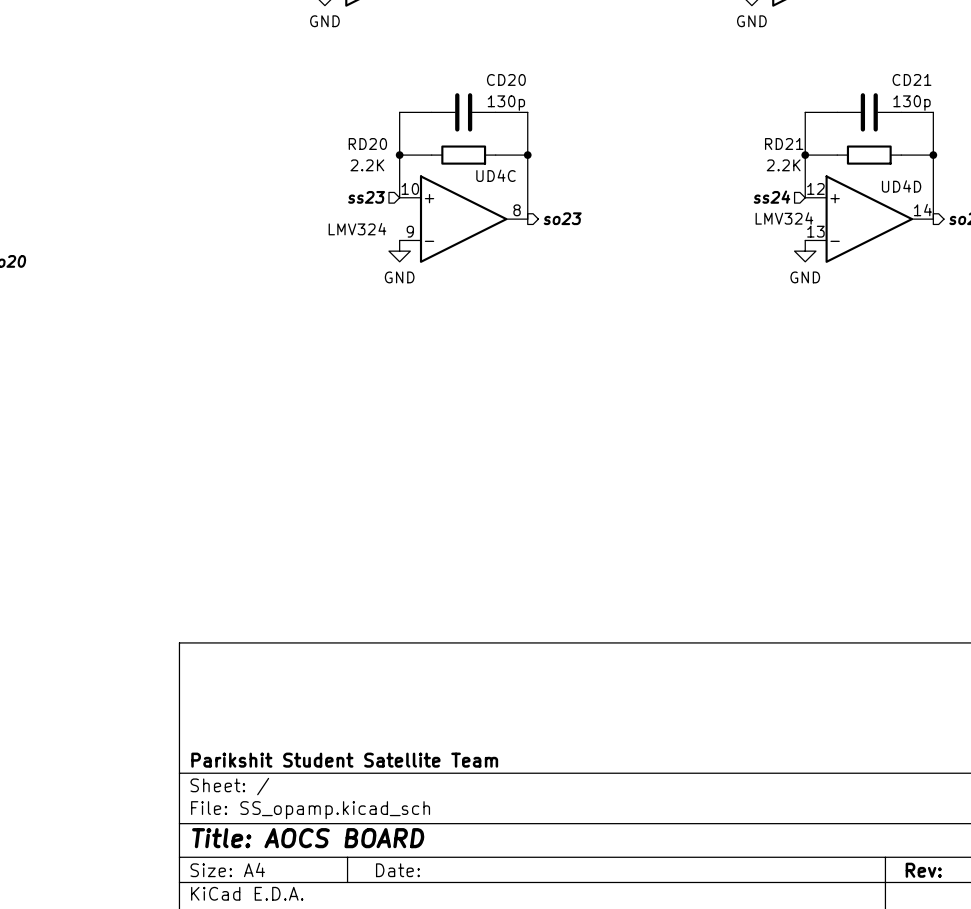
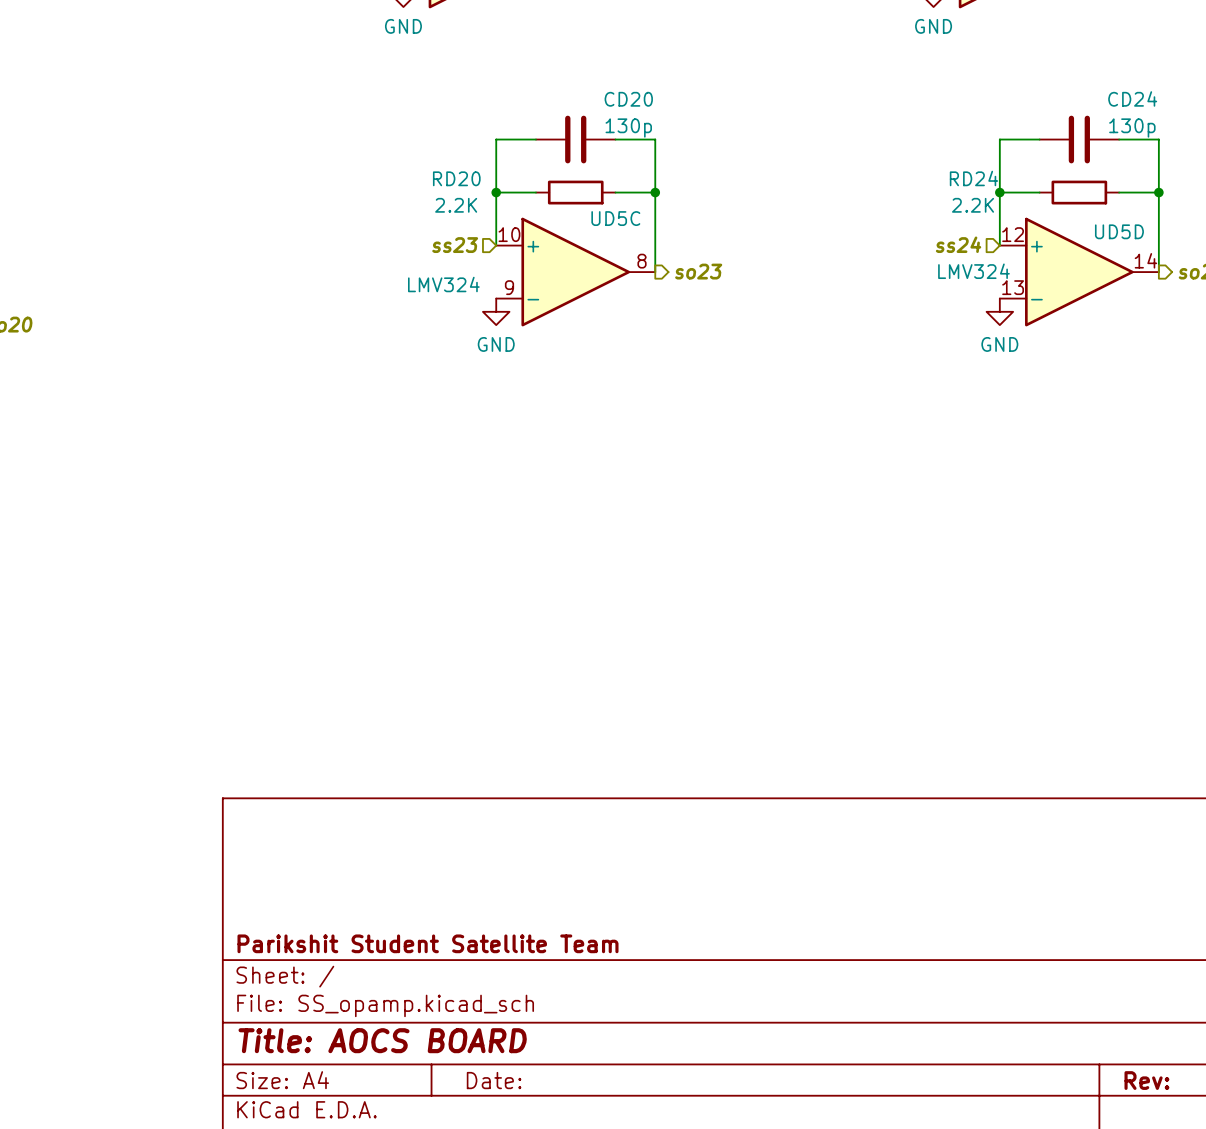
CD21 name: CD21 (911, 79) -> CD24 (1132, 98)
RD21 name: RD21 (784, 144) -> RD24 (973, 178)
UD4C name: UD4C (495, 175) -> UD5C (615, 218)
UD4D name: UD4D (901, 186) -> UD5D (1119, 231)

